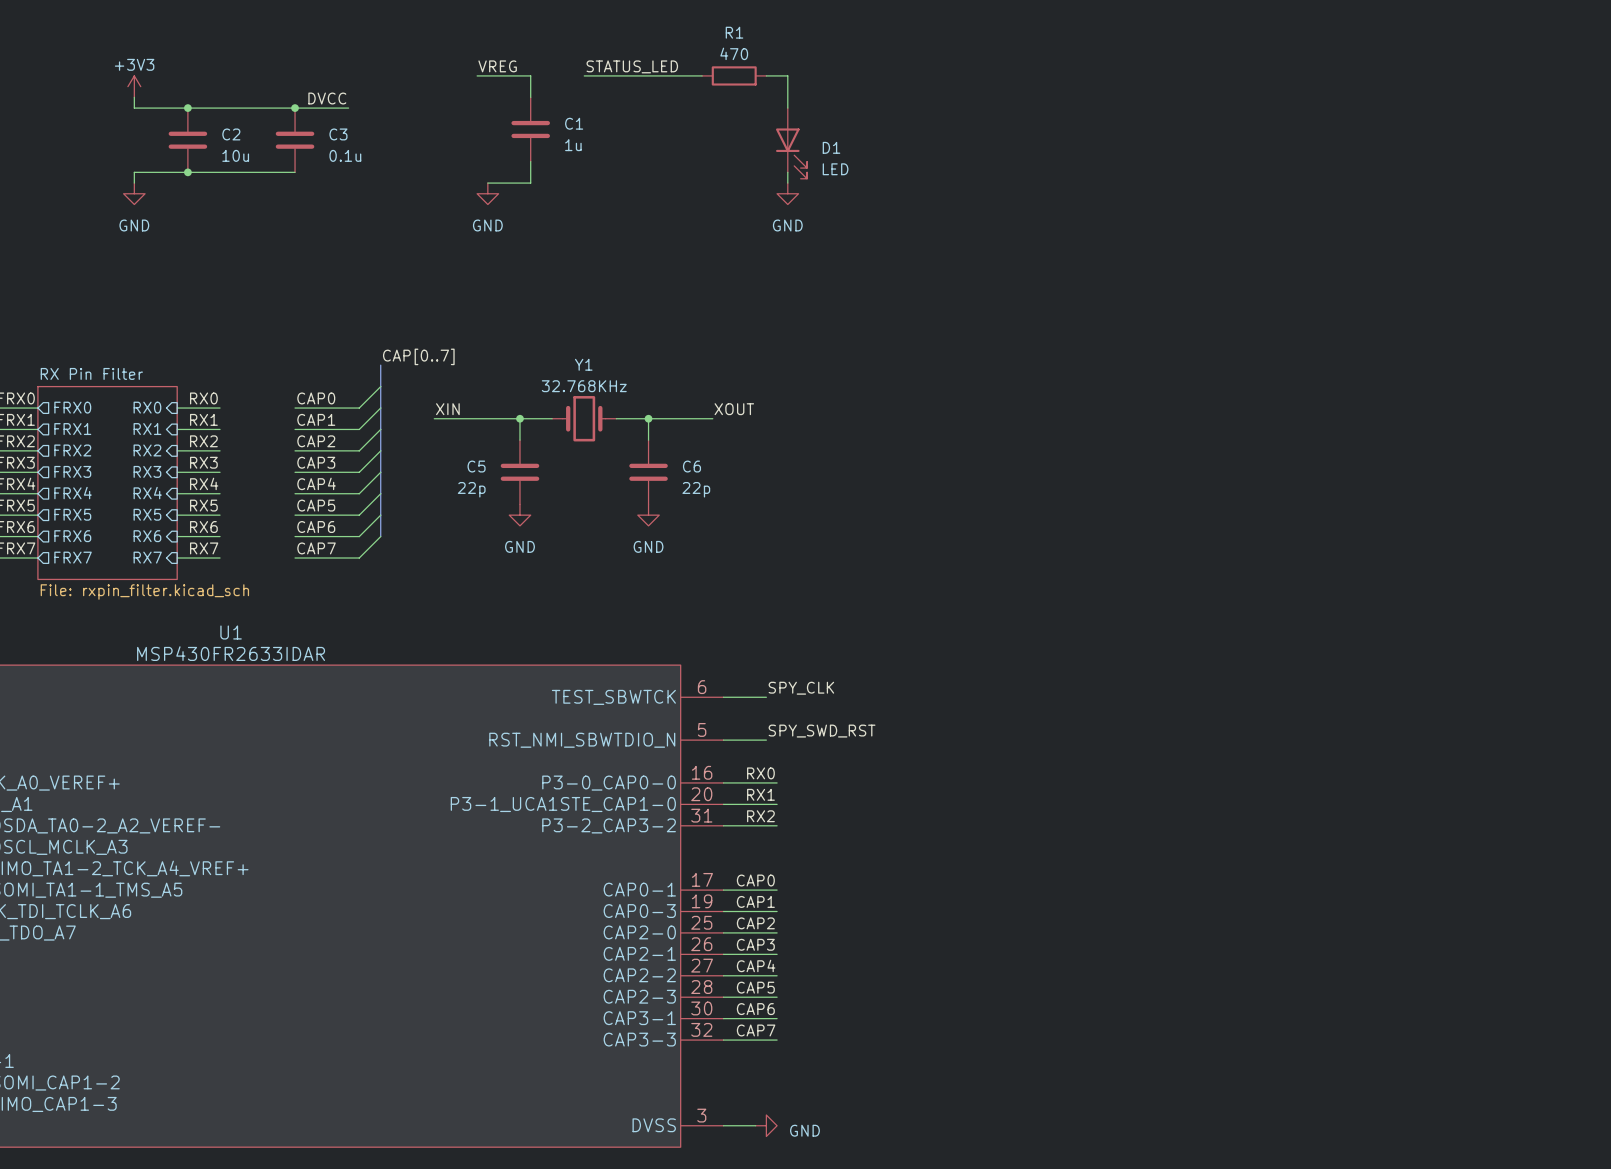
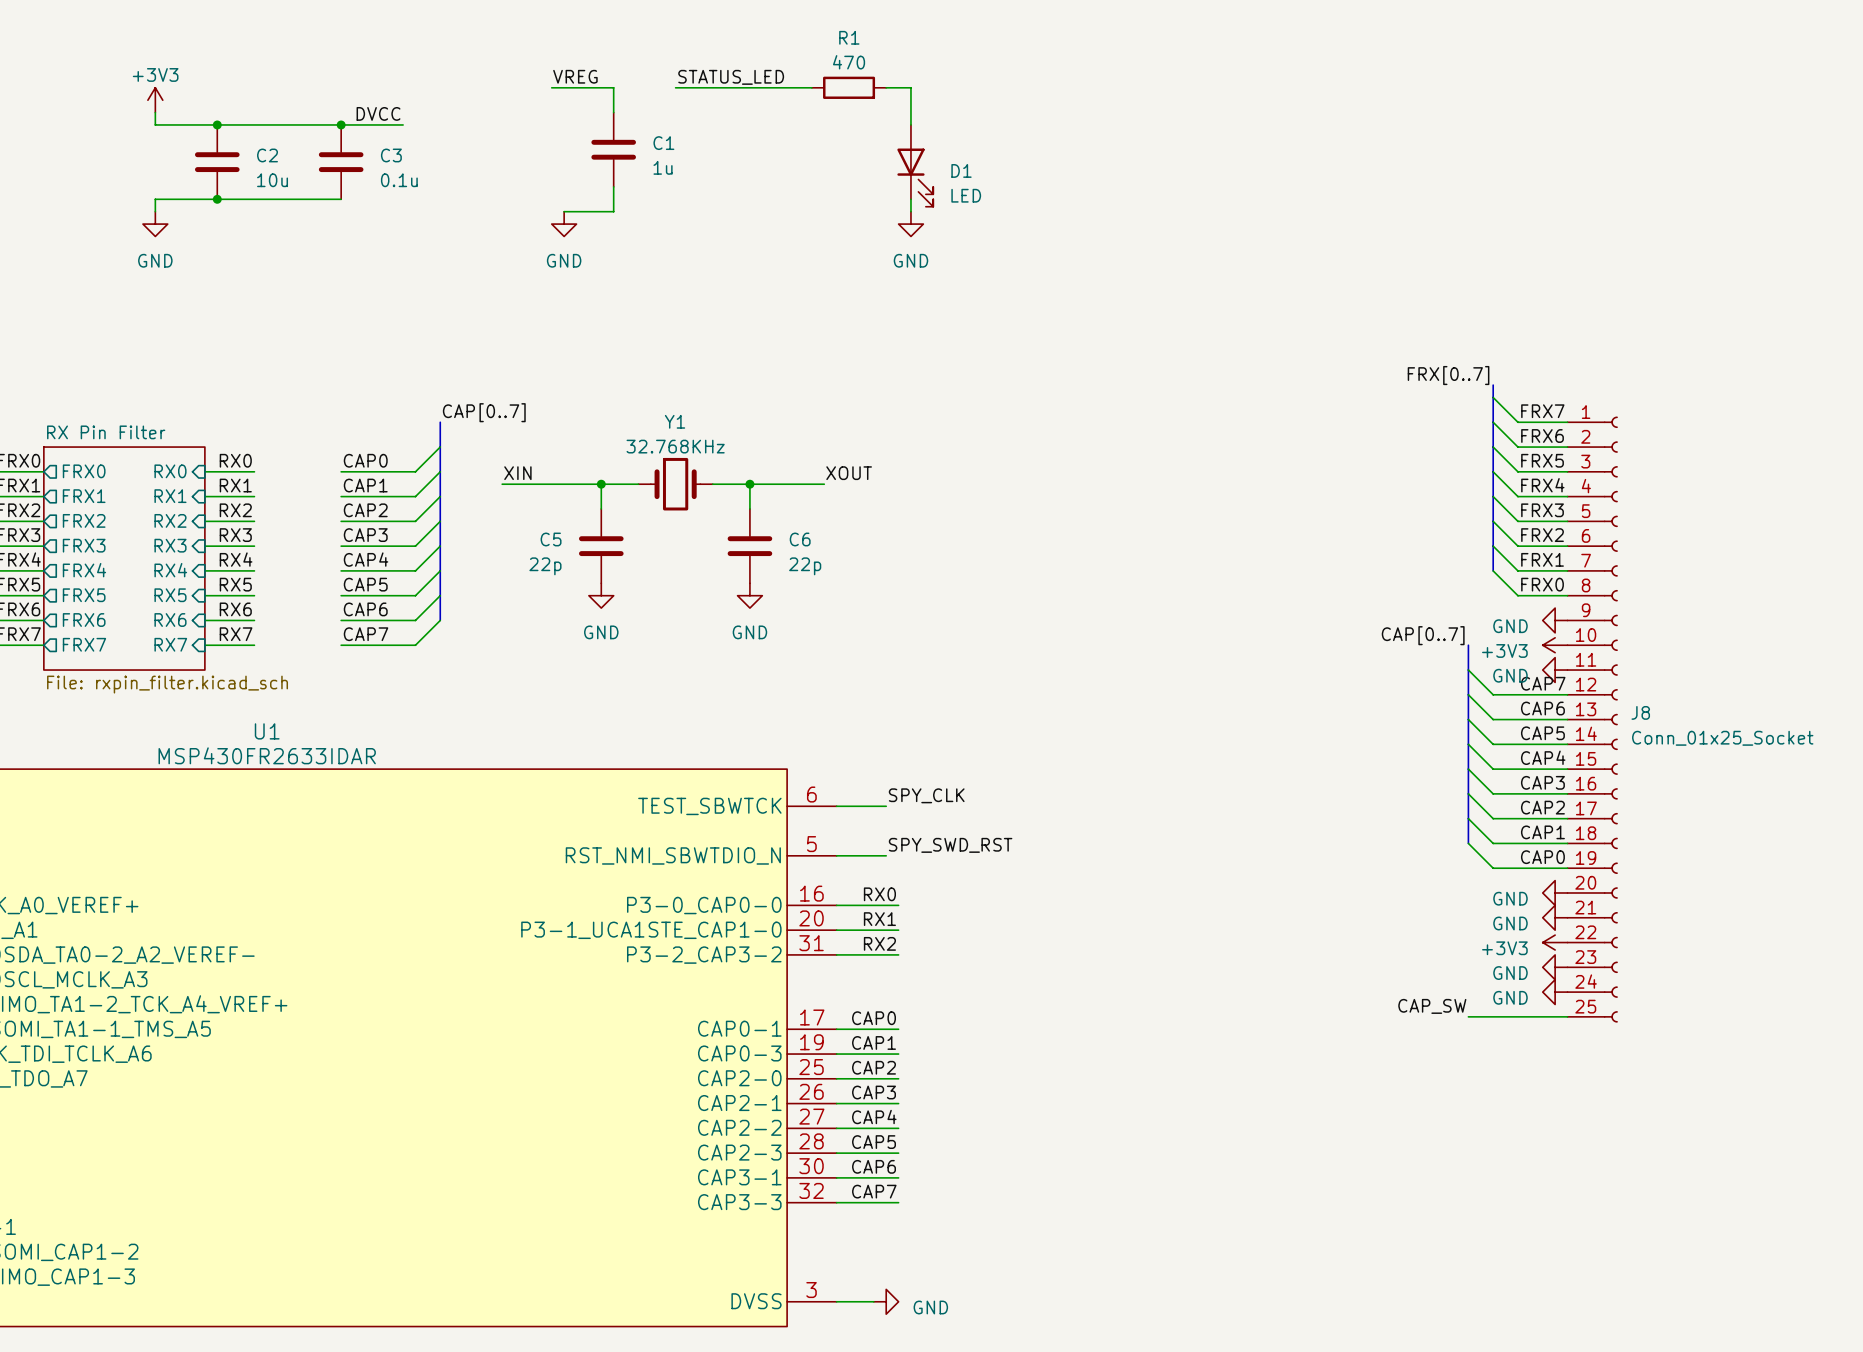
label: none -> FRX[0..7] (1448, 375)
bus: none -> (1493, 385) (1493, 570)
wire: none -> (1493, 397) (1517, 422) (1567, 422)
label: none -> FRX7 (1542, 411)
wire: none -> (1493, 422) (1517, 447) (1567, 447)
label: none -> FRX6 (1542, 435)
wire: none -> (1493, 447) (1517, 471) (1567, 471)
label: none -> FRX5 (1542, 460)
wire: none -> (1493, 471) (1517, 496) (1567, 496)
label: none -> FRX4 (1542, 485)
wire: none -> (1493, 496) (1517, 521) (1567, 521)
label: none -> FRX3 (1542, 510)
wire: none -> (1493, 521) (1517, 546) (1567, 546)
label: none -> FRX2 (1542, 535)
wire: none -> (1493, 546) (1517, 570) (1567, 570)
label: none -> FRX1 (1542, 559)
wire: none -> (1493, 570) (1517, 595) (1567, 595)
label: none -> FRX0 (1542, 584)
power symbol: none -> GND (1555, 620)
label: none -> CAP[0..7] (1423, 635)
bus: none -> (1468, 645) (1468, 843)
power symbol: none -> +3V3 (1555, 645)
wire: none -> (1468, 670) (1493, 694) (1567, 694)
power symbol: none -> GND (1555, 670)
label: none -> CAP7 (1543, 683)
wire: none -> (1468, 694) (1493, 719) (1567, 719)
label: none -> CAP6 (1542, 708)
wire: none -> (1468, 719) (1493, 744) (1567, 744)
J8: none -> Conn_01x25_Socket (1592, 719)
label: none -> CAP5 (1542, 733)
wire: none -> (1468, 744) (1493, 769) (1567, 769)
label: none -> CAP4 (1543, 757)
wire: none -> (1468, 769) (1493, 793) (1567, 793)
label: none -> CAP3 (1542, 782)
wire: none -> (1468, 793) (1493, 818) (1567, 818)
label: none -> CAP2 (1542, 807)
wire: none -> (1468, 818) (1493, 843) (1567, 843)
label: none -> CAP1 (1542, 832)
wire: none -> (1468, 843) (1493, 868) (1567, 868)
label: none -> CAP0 (1542, 857)
power symbol: none -> GND (1555, 892)
power symbol: none -> GND (1555, 917)
power symbol: none -> +3V3 (1555, 942)
power symbol: none -> GND (1555, 967)
power symbol: none -> GND (1555, 992)
label: none -> CAP_SW (1432, 1006)
wire: none -> (1468, 1016) (1567, 1016)

